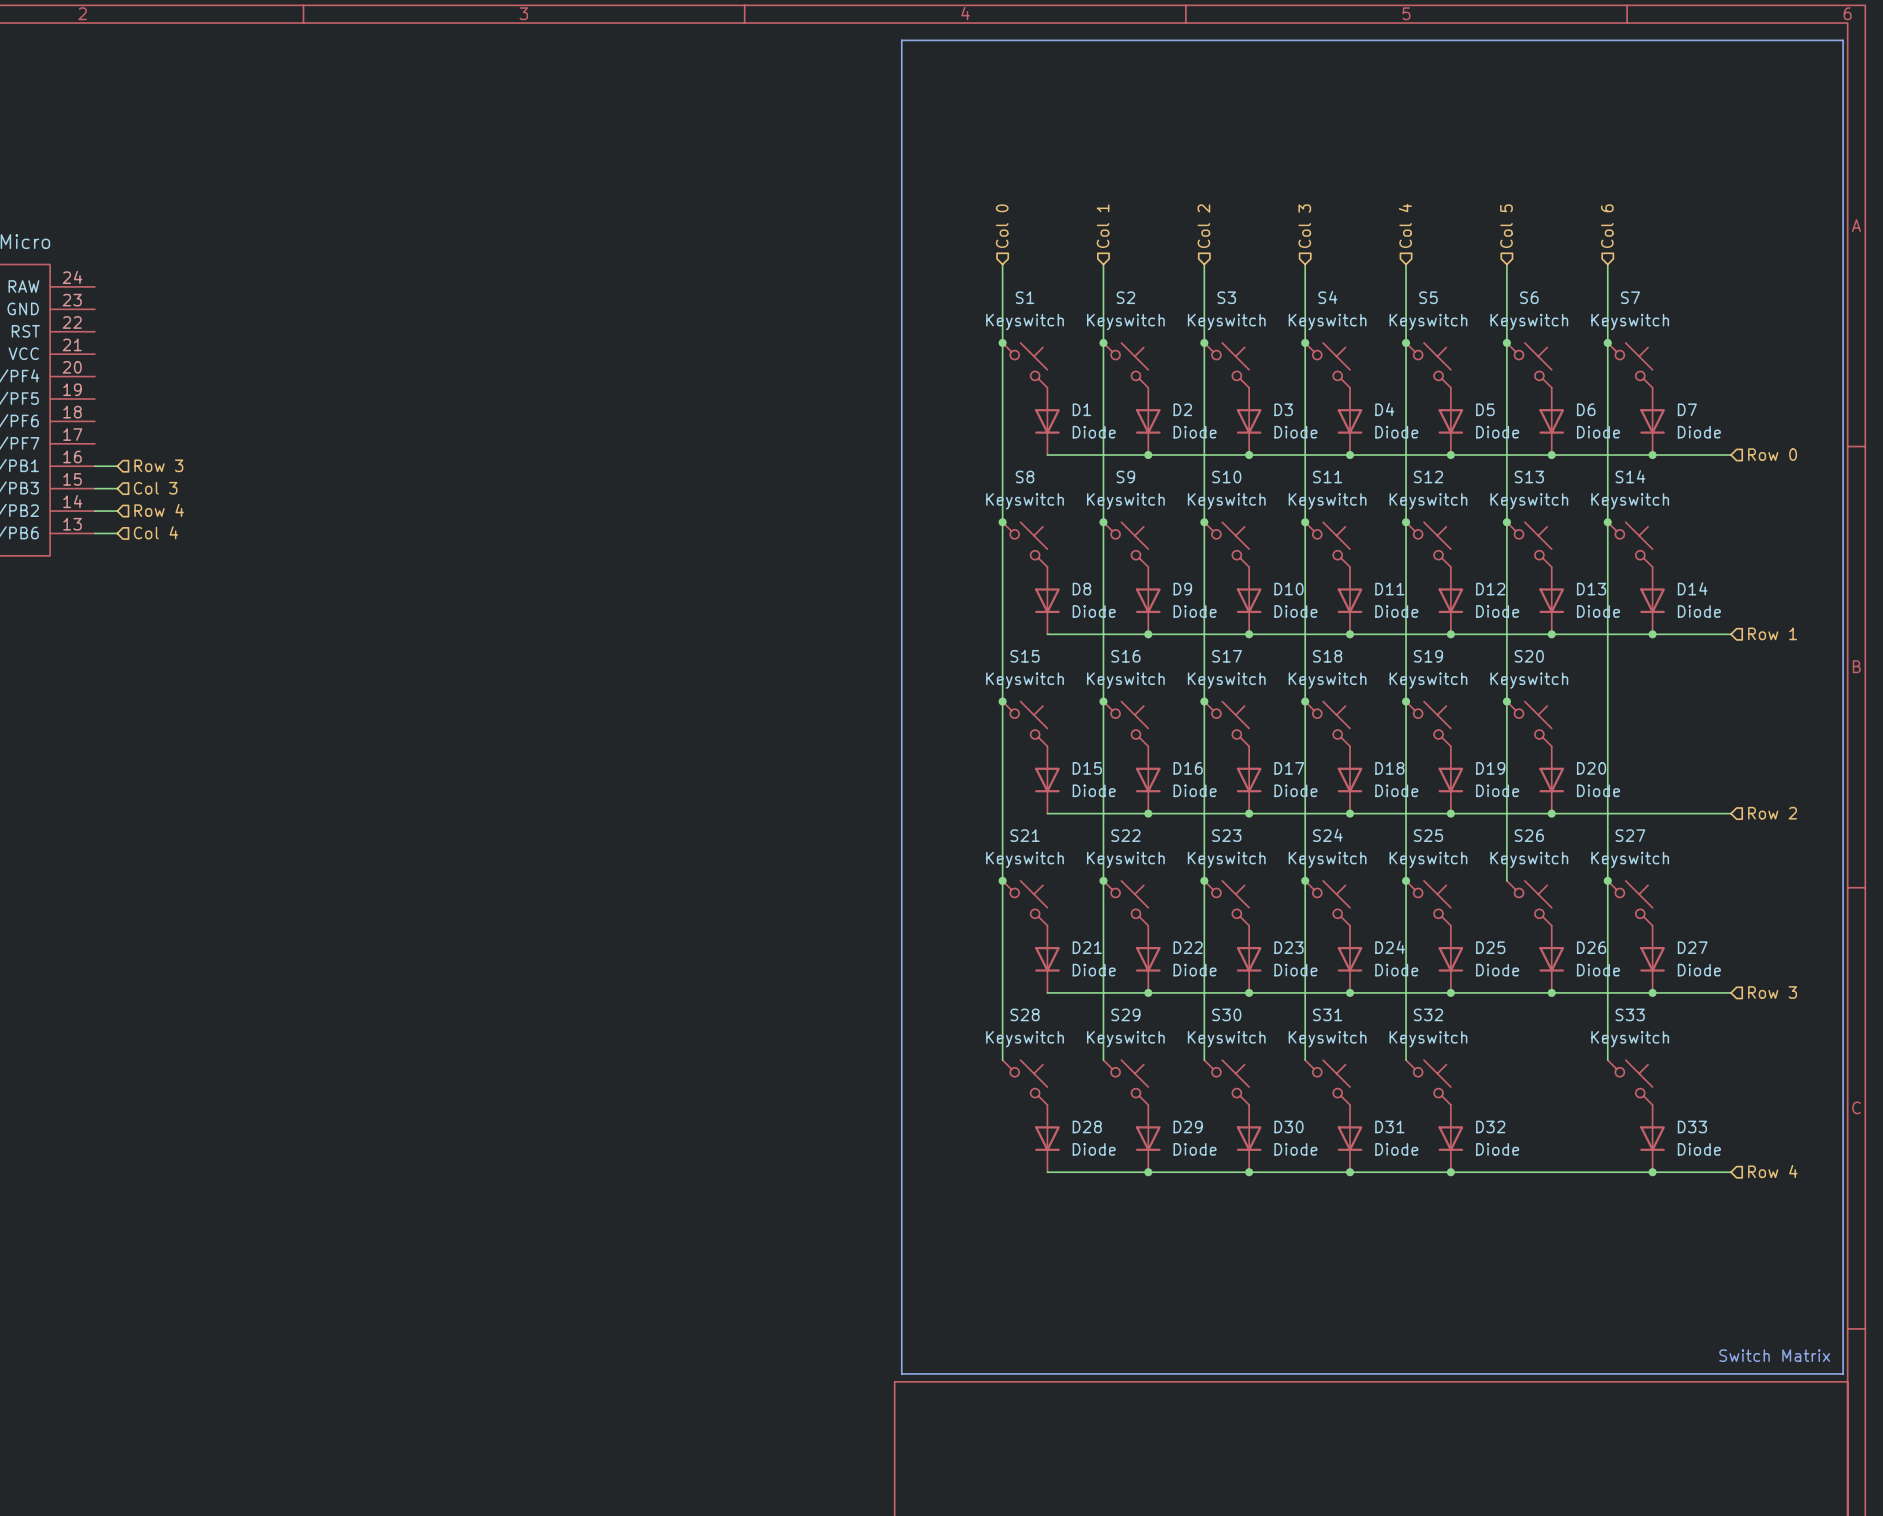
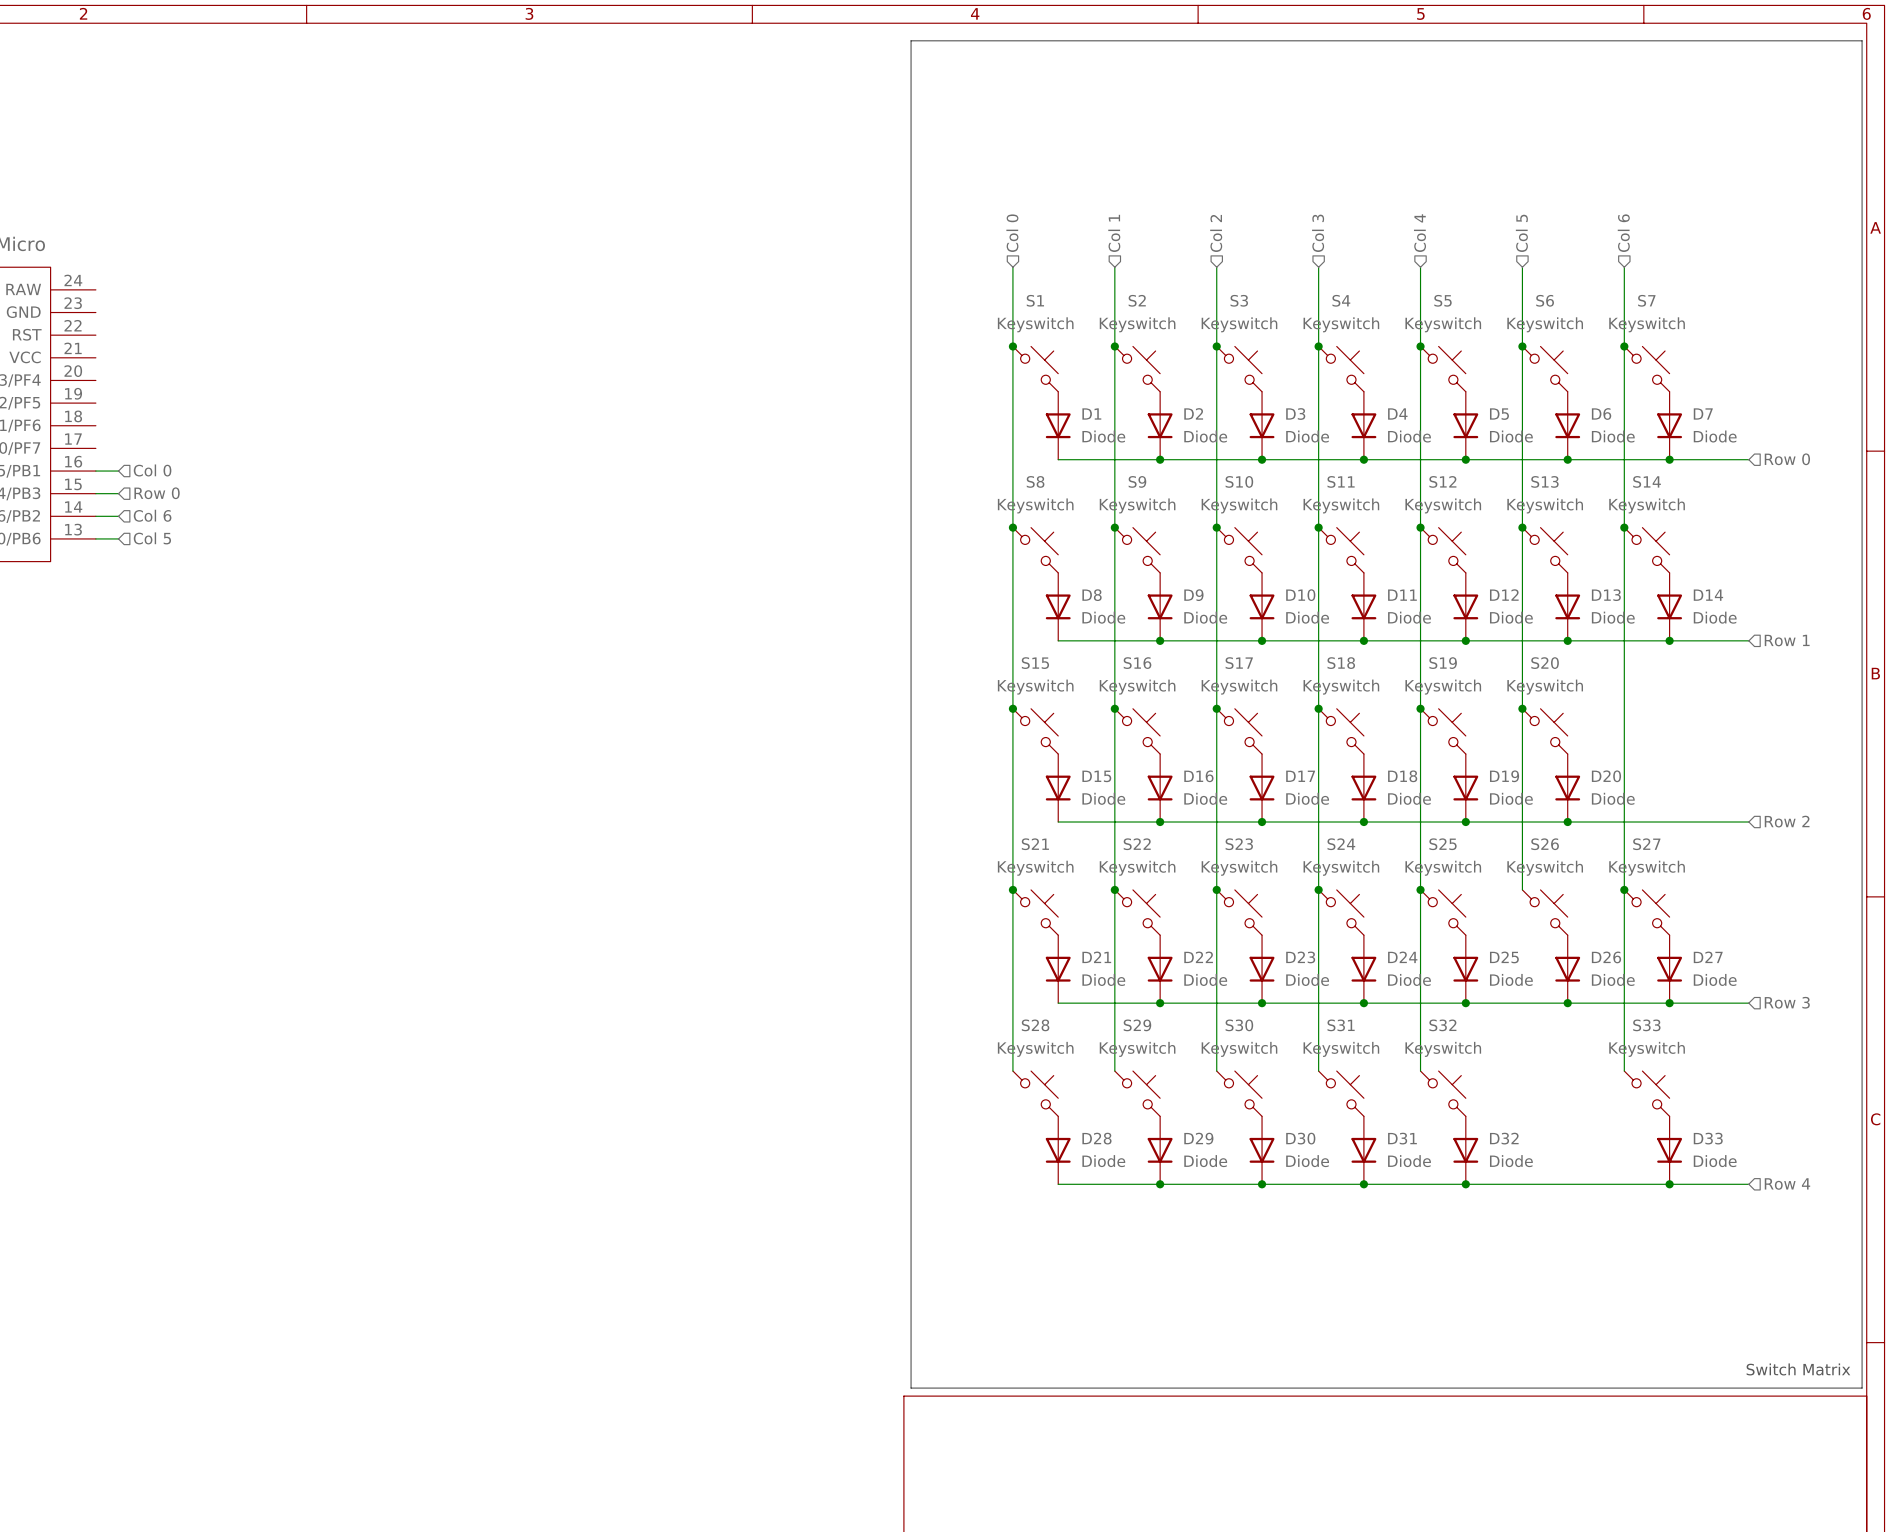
hierarchical label: Row 3 (158, 465) -> Col 0 (152, 470)
hierarchical label: Col 3 (155, 488) -> Row 0 (157, 493)
hierarchical label: Row 4 (159, 510) -> Col 6 (152, 515)
hierarchical label: Col 4 (155, 532) -> Col 5 (152, 538)

